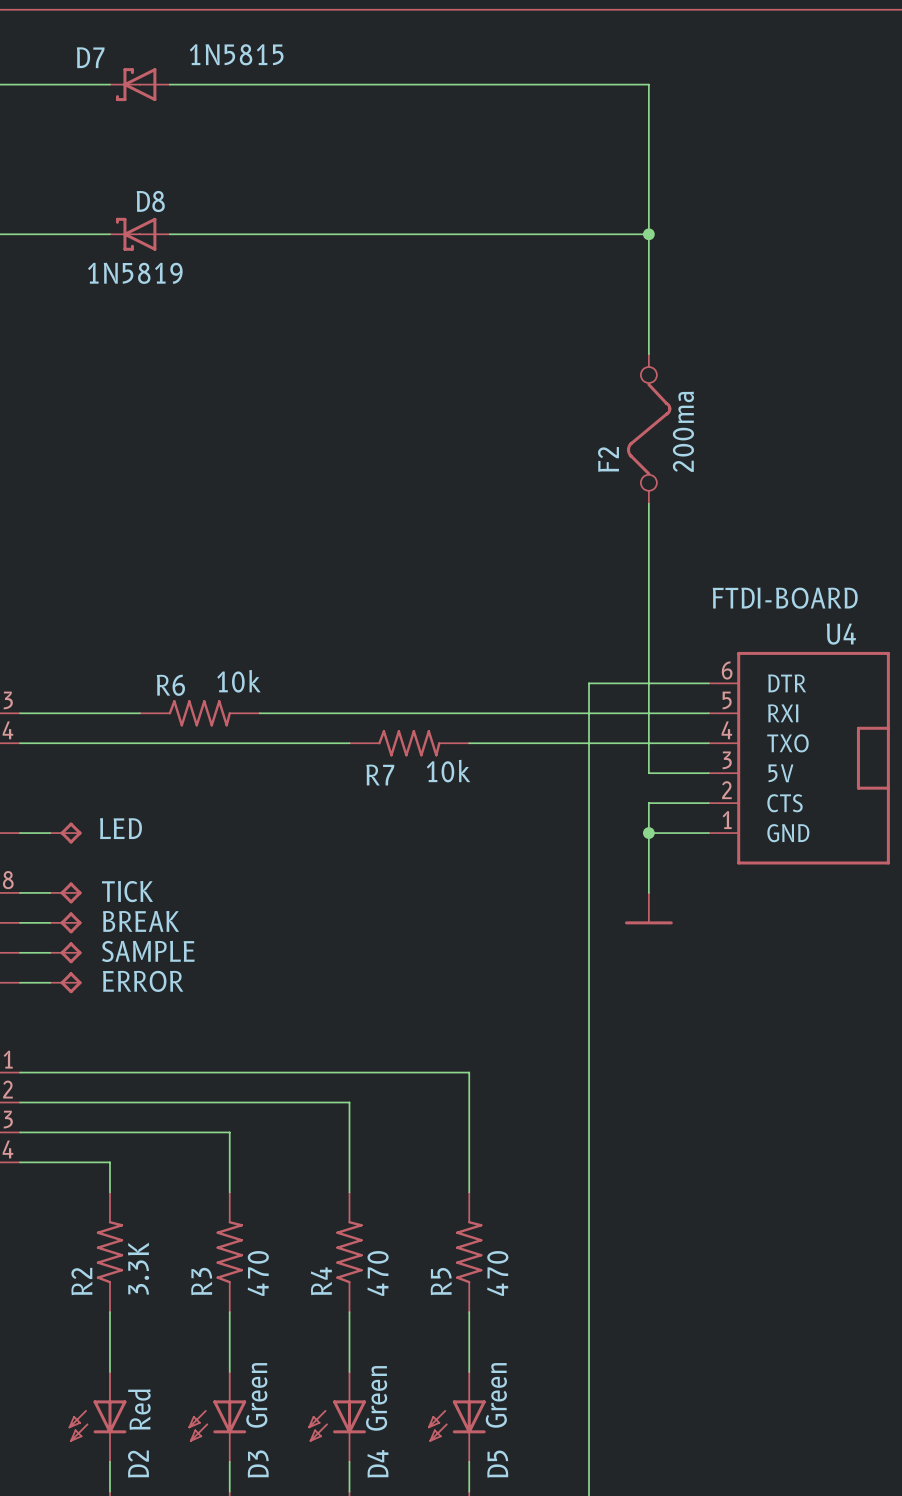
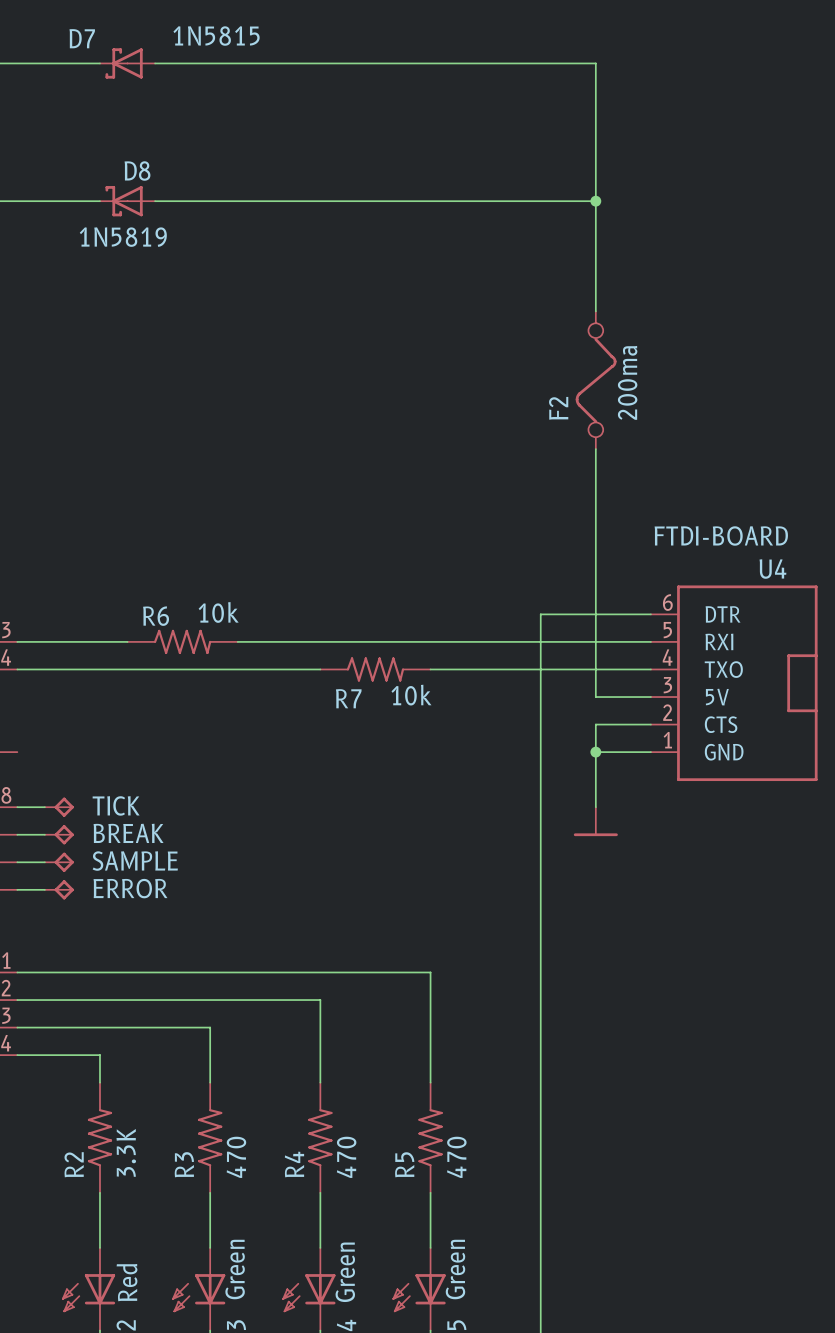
wire: (20, 833) (50, 833) -> none
LED: (65, 833) -> none

